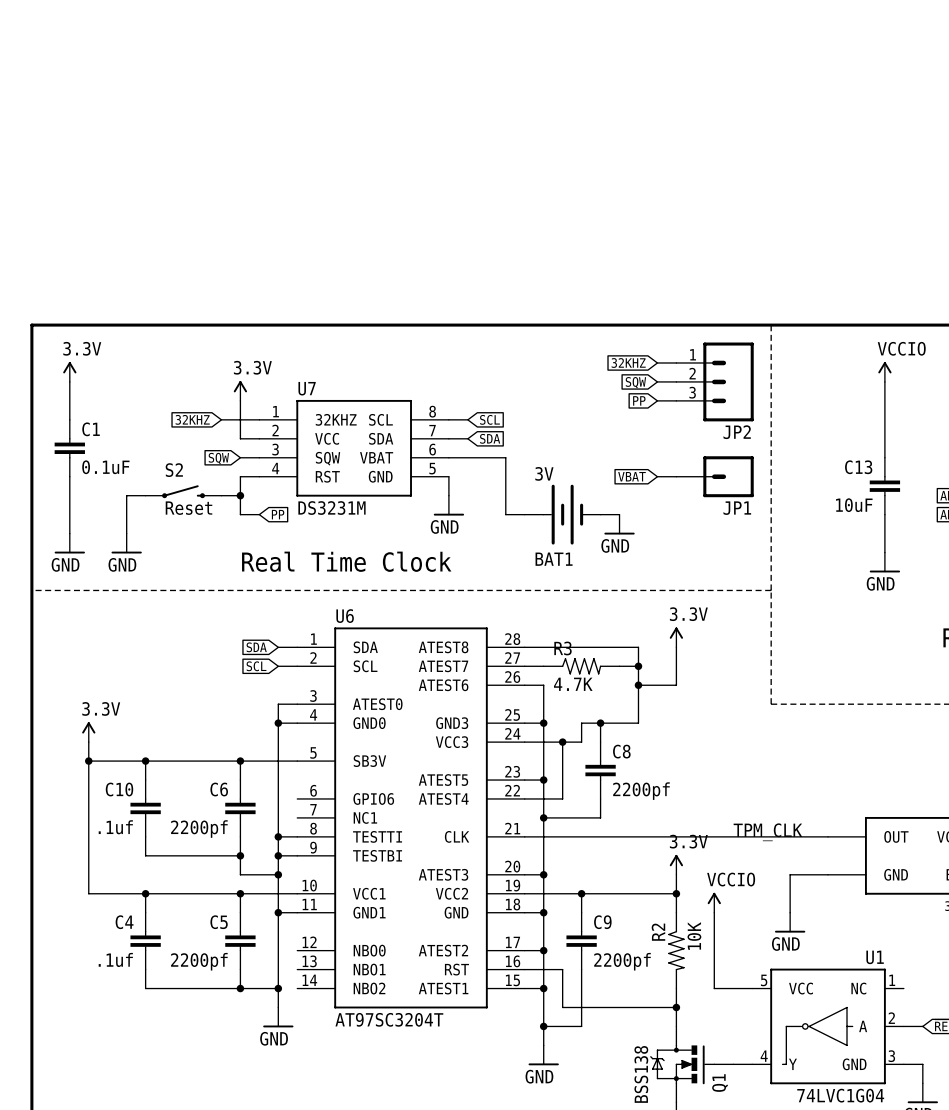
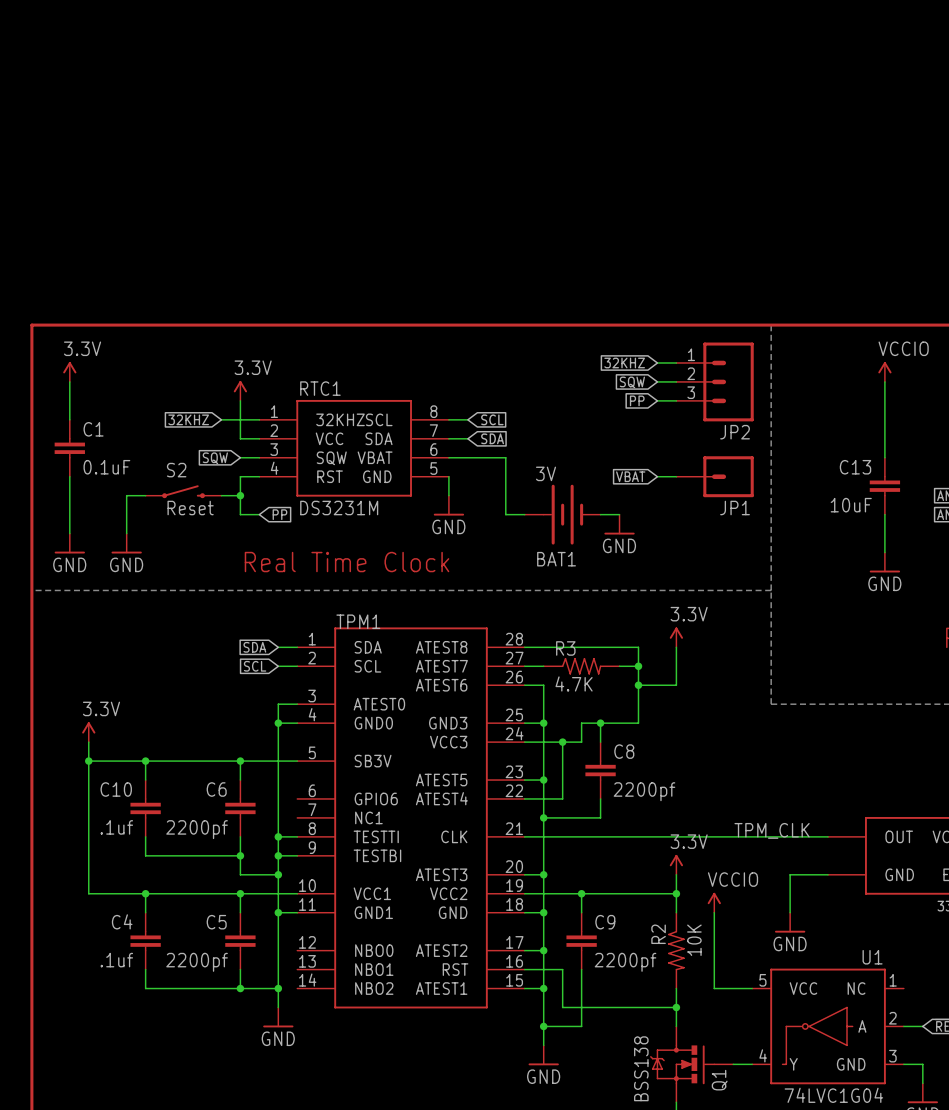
U7 name: U7 (307, 388) -> RTC1 (320, 388)
U6 name: U6 (345, 616) -> TPM1 (358, 621)
U6 value: AT97SC3204T (389, 1019) -> none

